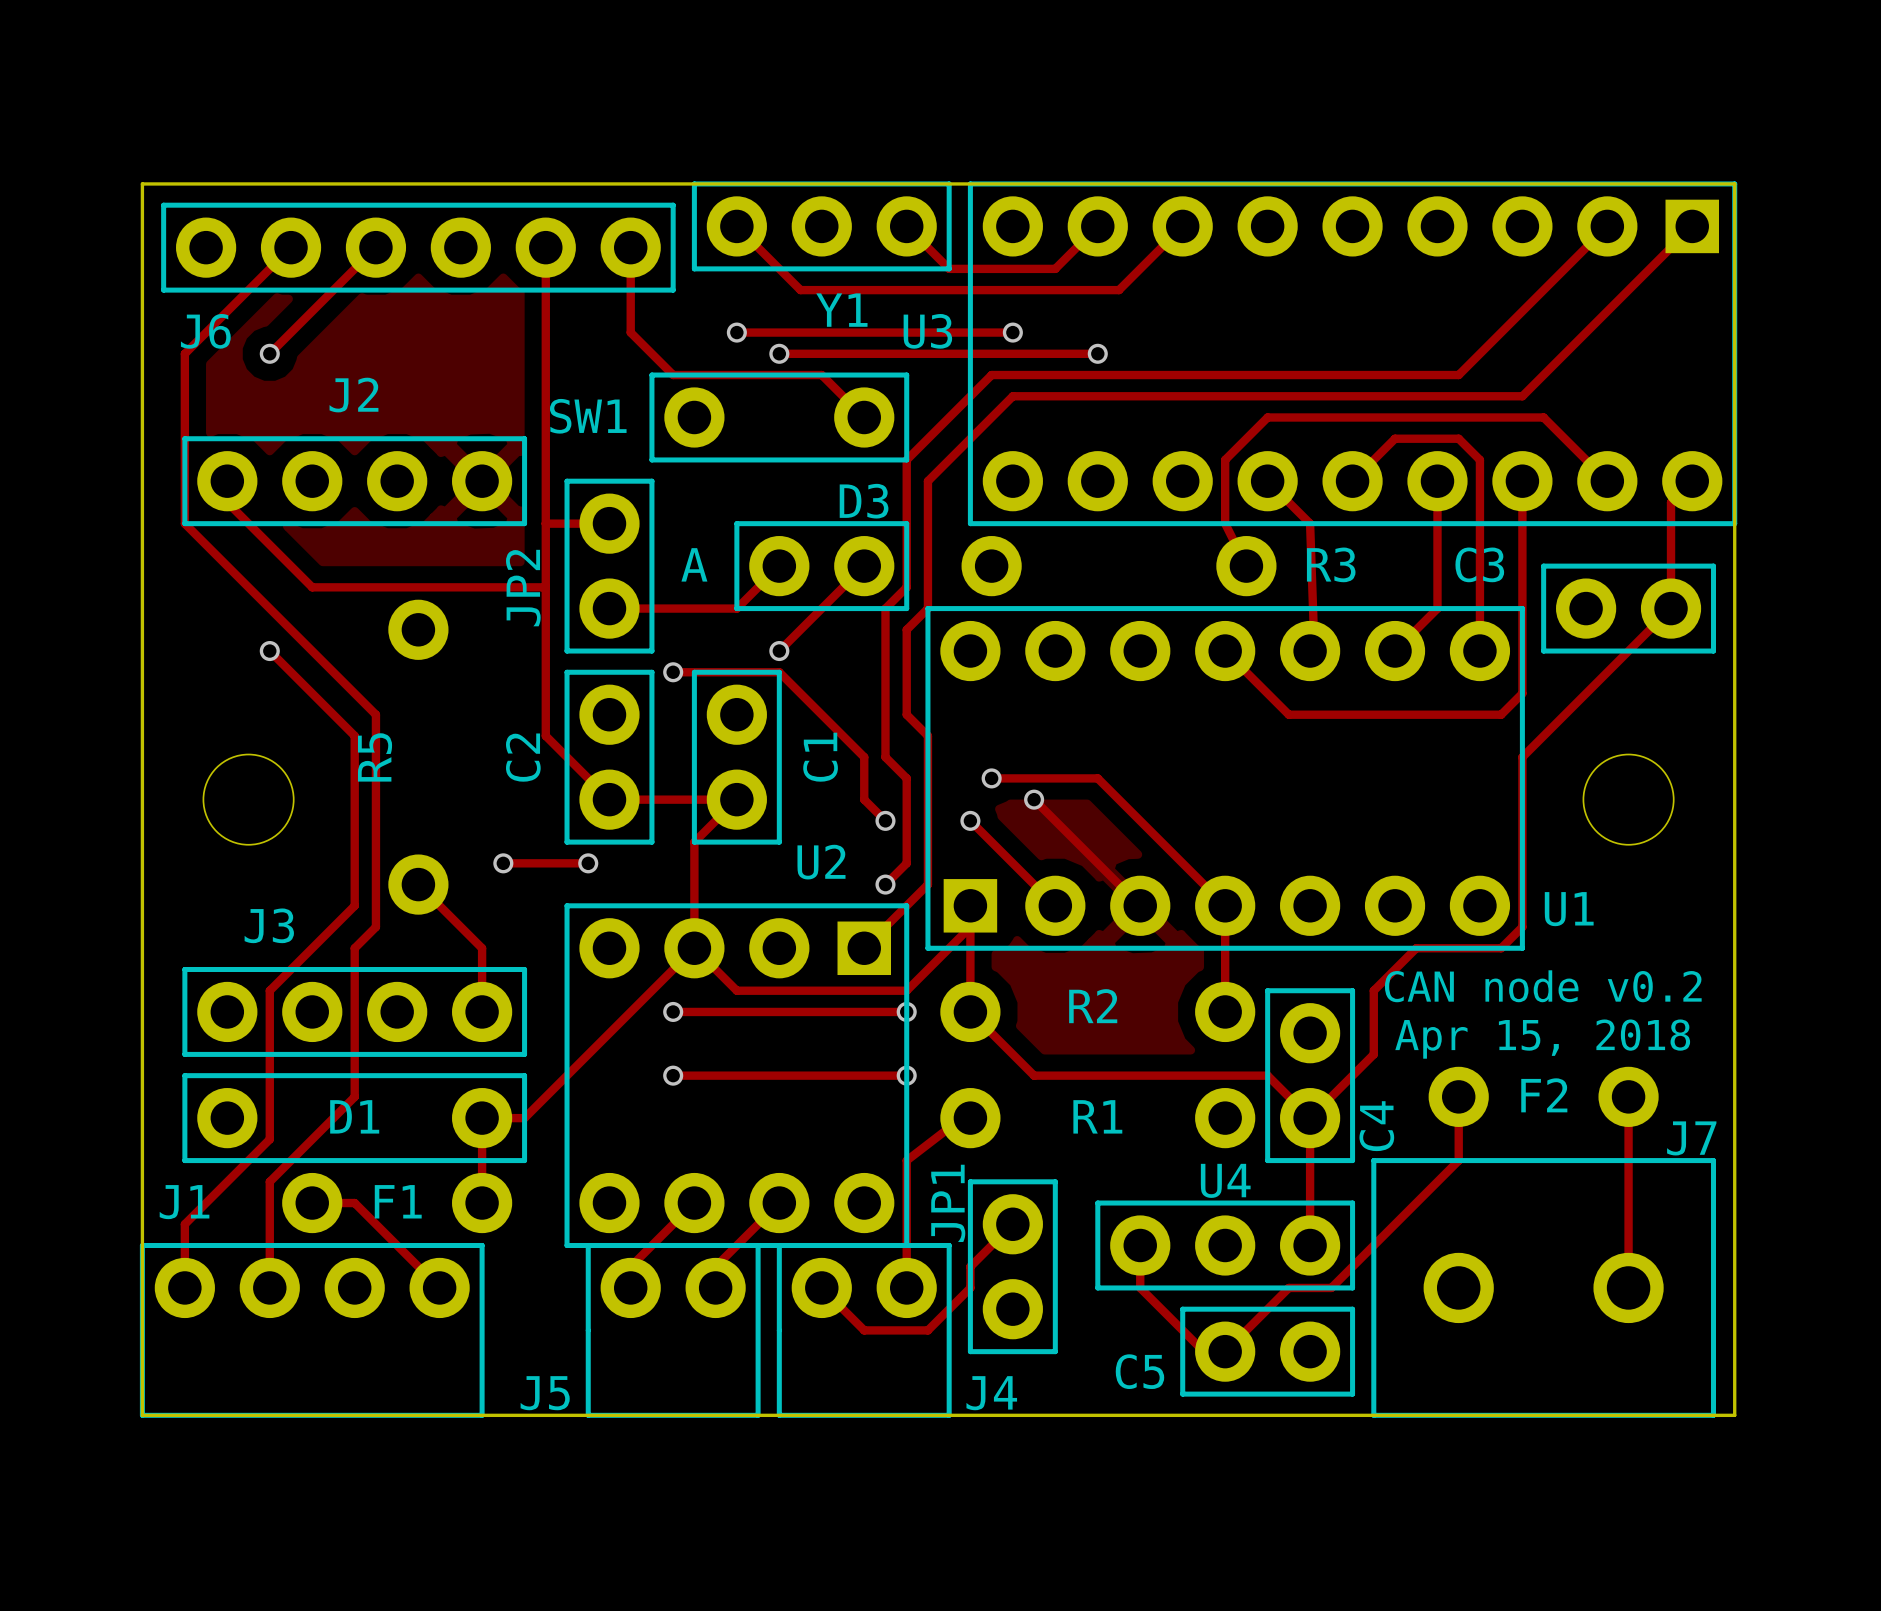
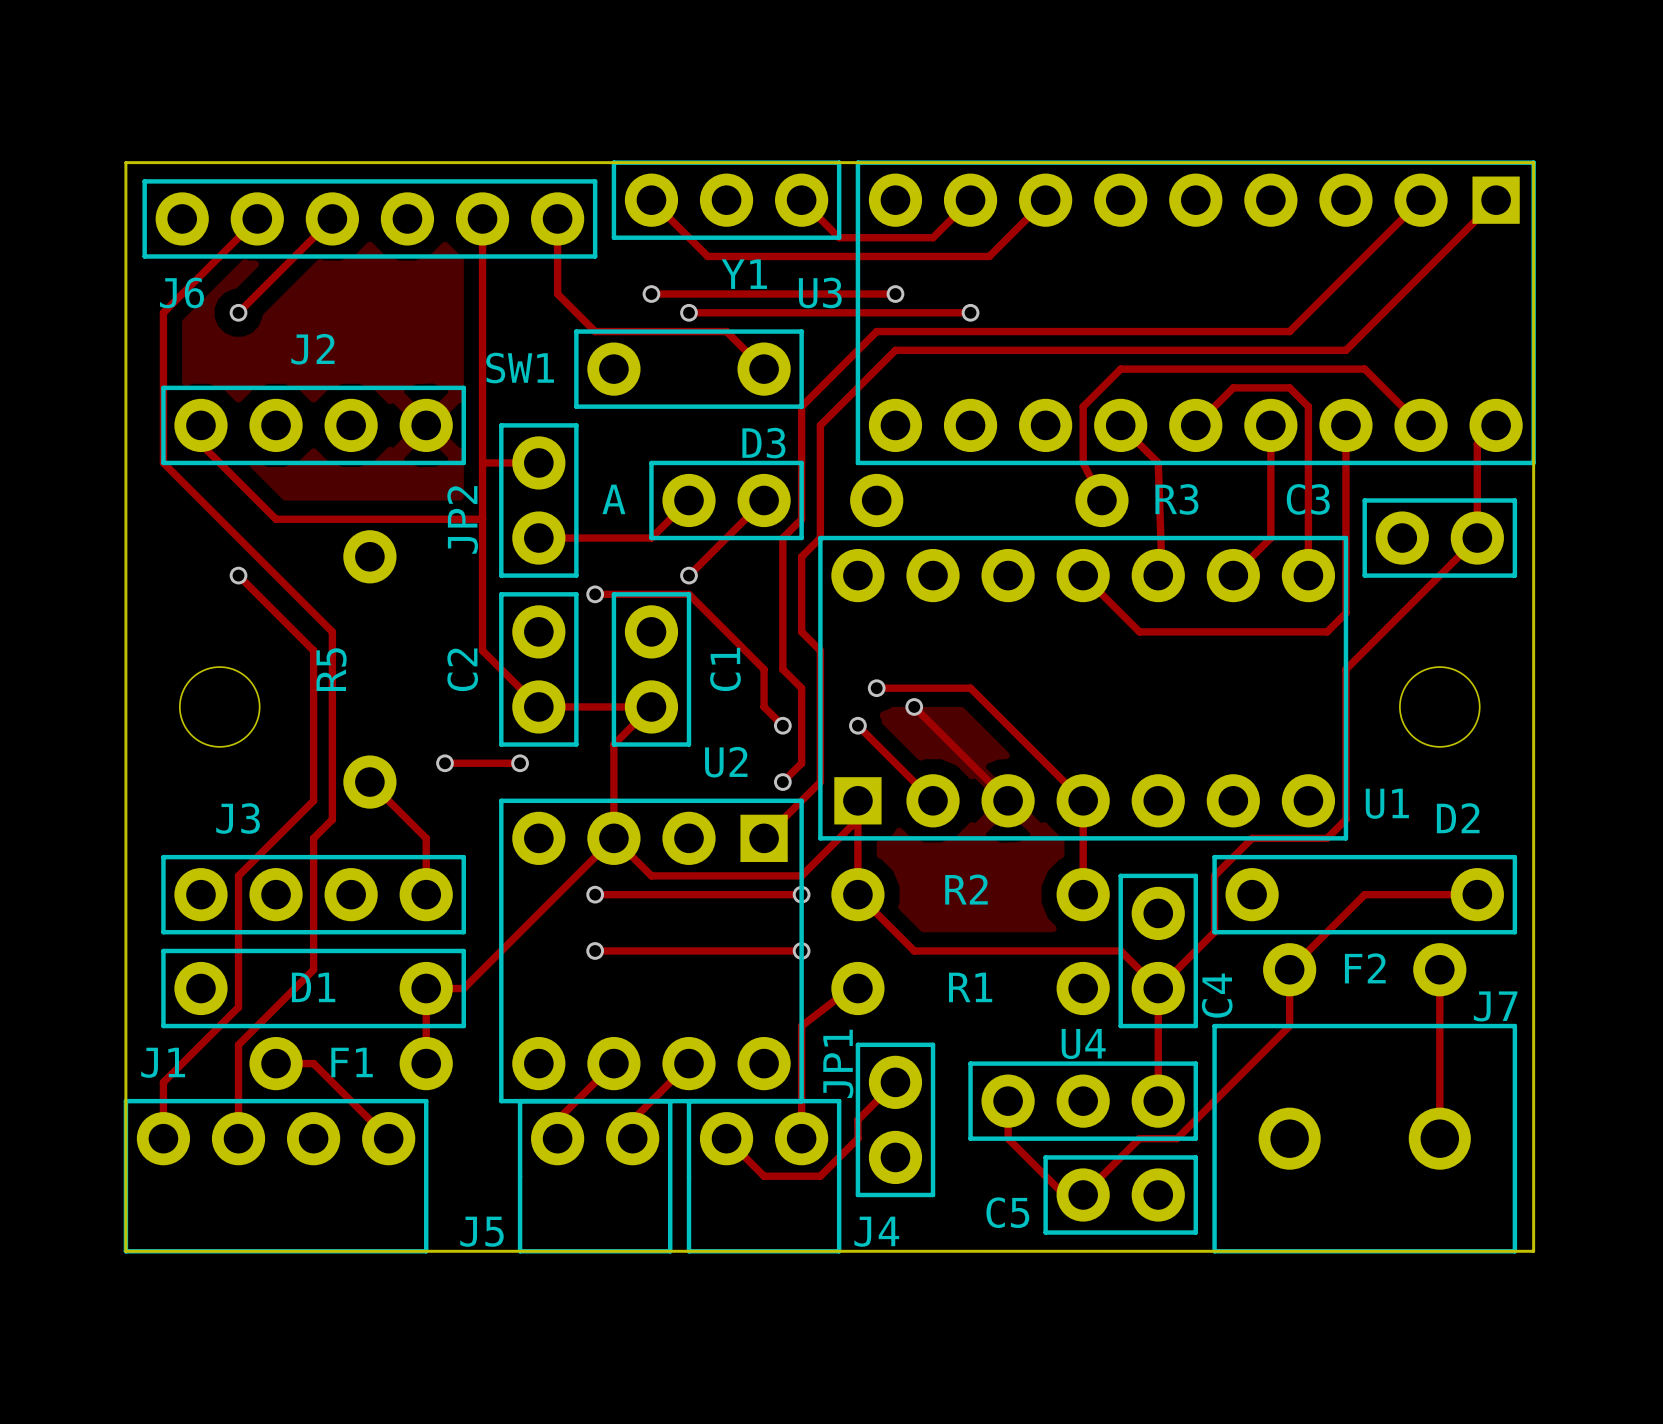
text: CAN node v0.2 (1543, 986) -> none
D2: none -> (1364, 894)
track: none -> (1477, 894) (1364, 894) (1289, 969)
text: Apr 15, 2018 (1542, 1039) -> none

